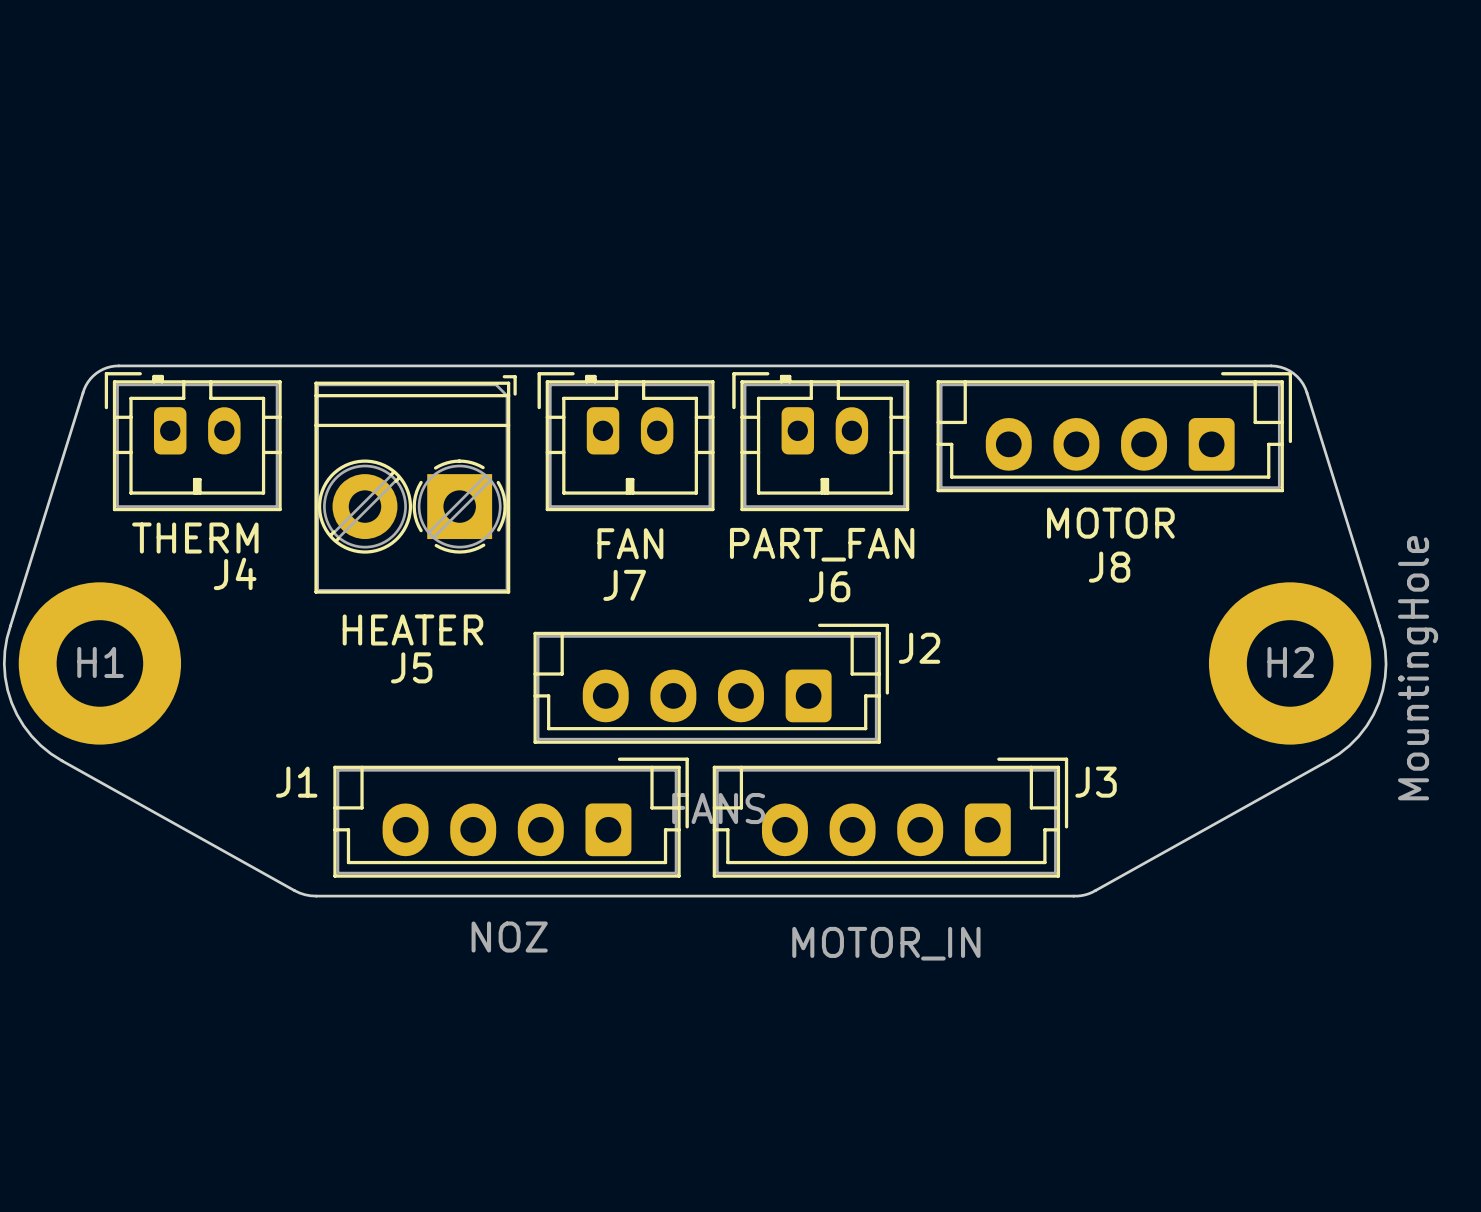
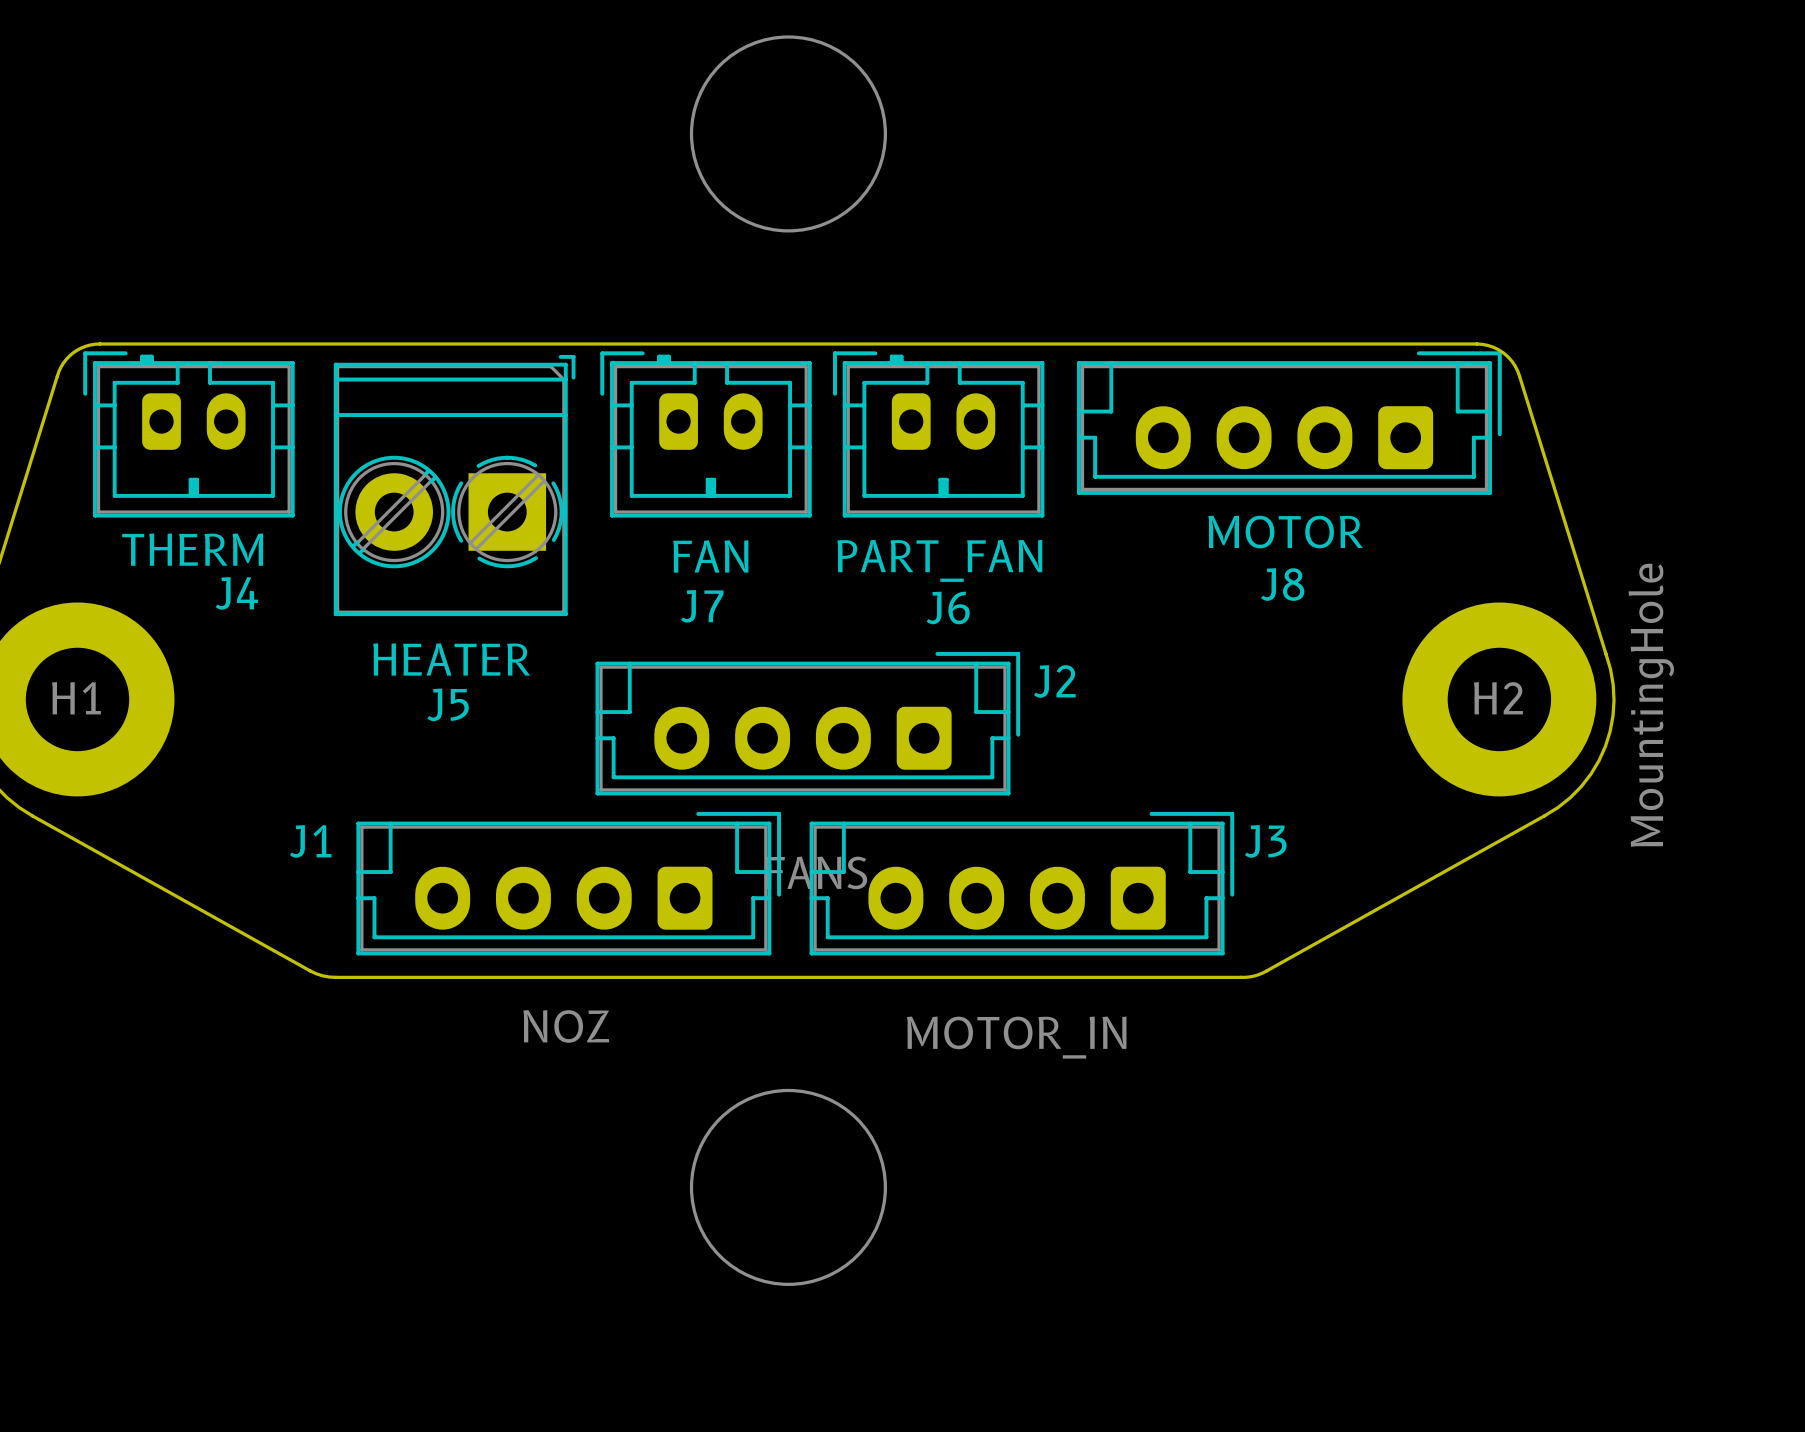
drawing: none -> [689, 35, 888, 233]
drawing: none -> [689, 1088, 888, 1286]

